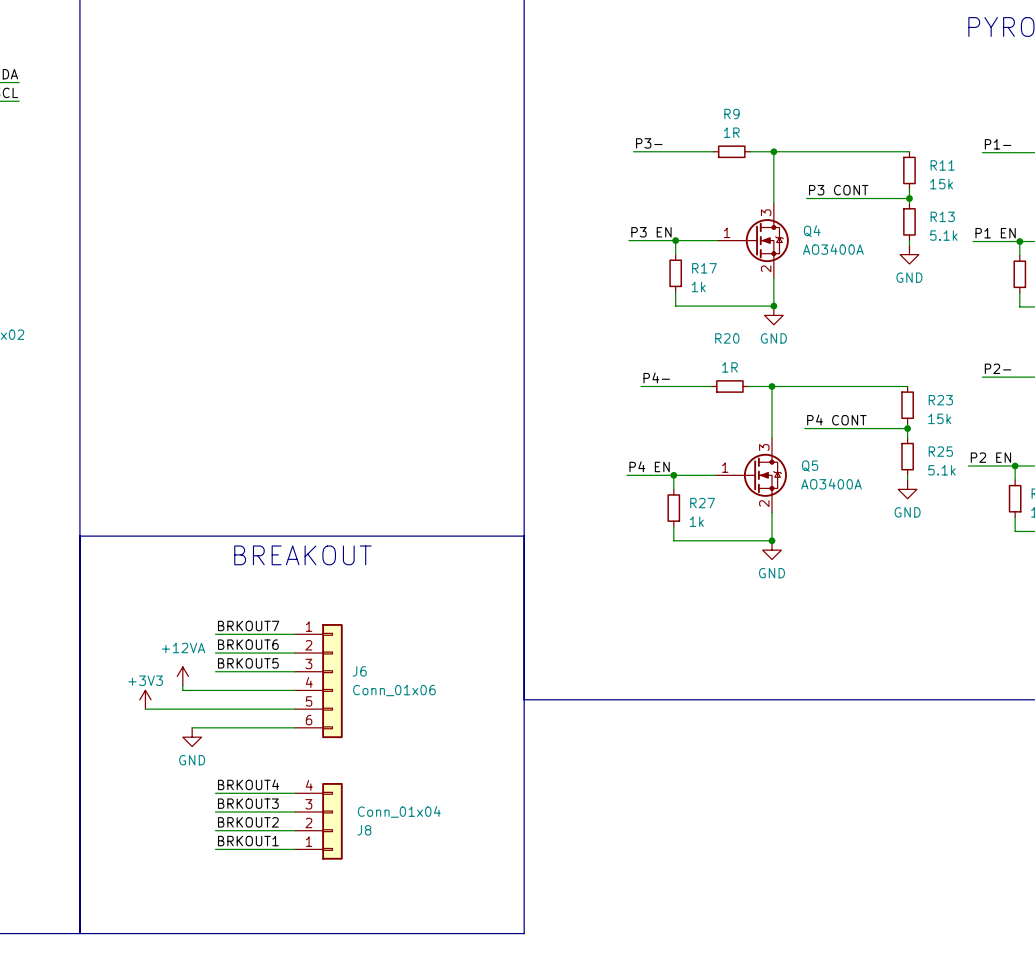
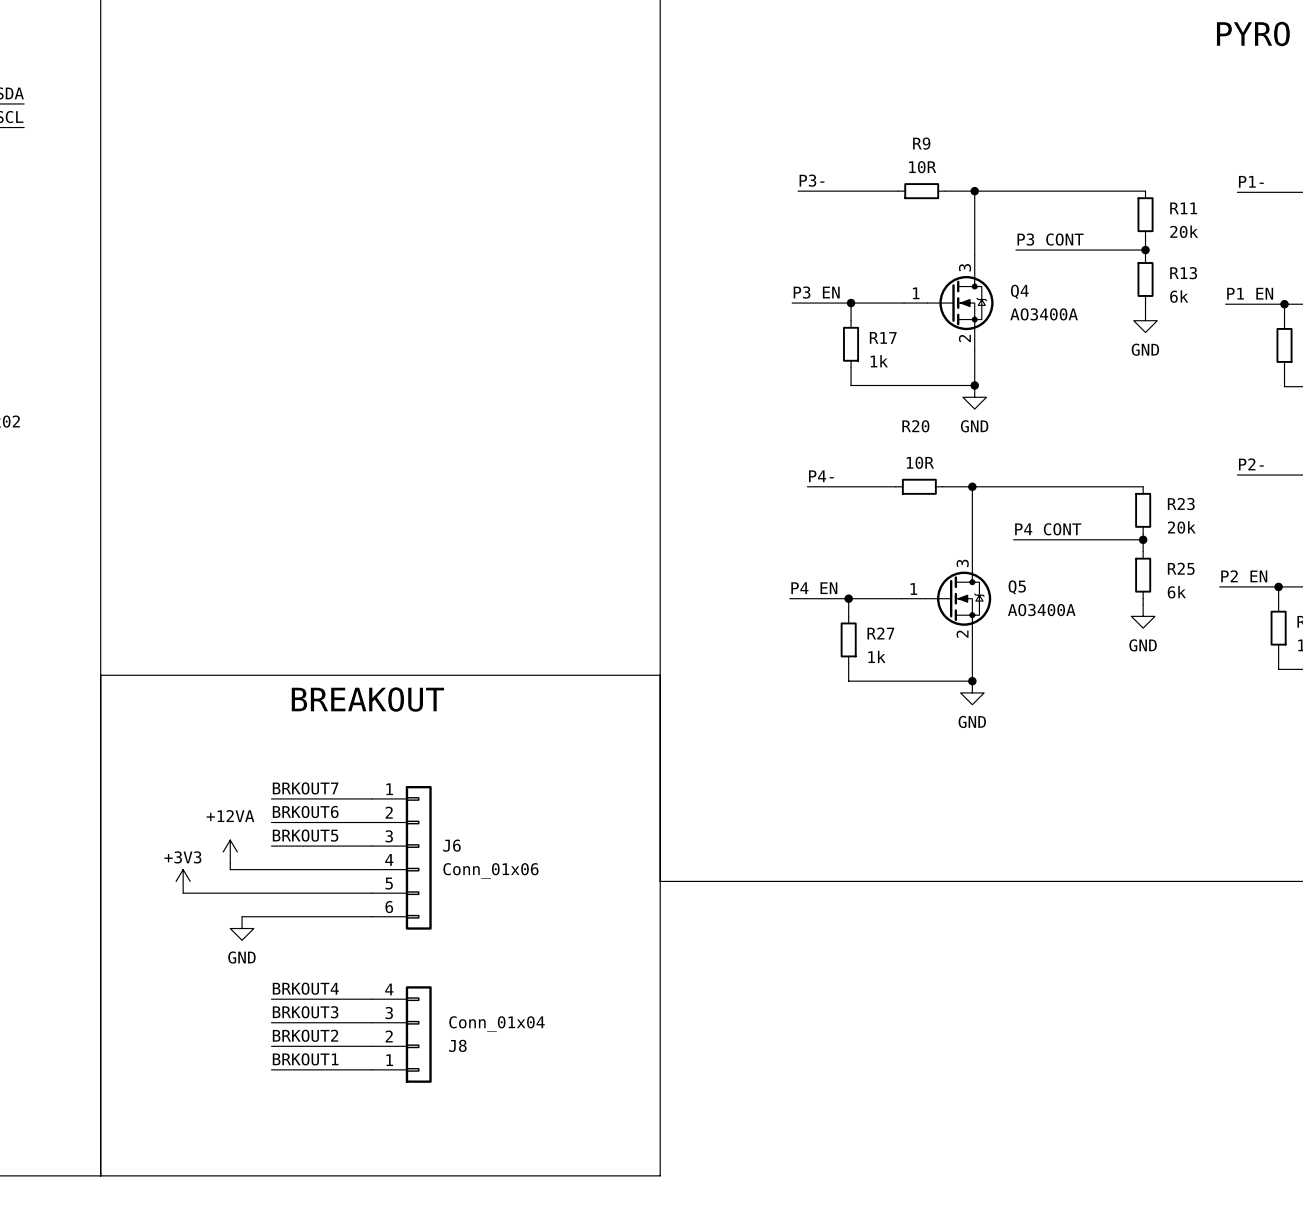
R9 value: 1R (731, 132) -> 10R (922, 167)
R11 value: 15k (941, 184) -> 20k (1184, 231)
R13 value: 5.1k (943, 235) -> 6k (1179, 296)
R20 value: 1R (729, 367) -> 10R (920, 462)
R23 value: 15k (939, 418) -> 20k (1181, 527)
R25 value: 5.1k (941, 470) -> 6k (1176, 592)

